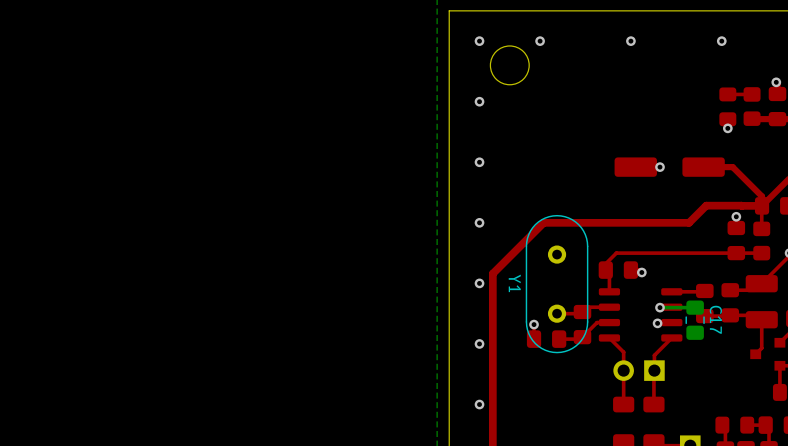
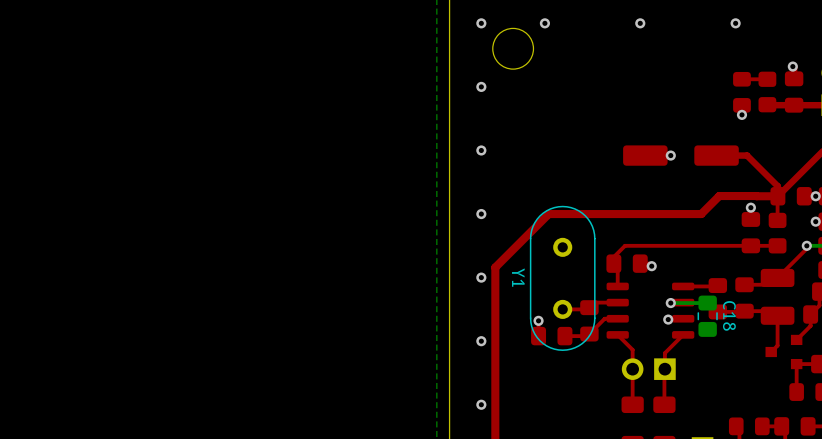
C17 name: C17 (715, 319) -> C18 (729, 315)

